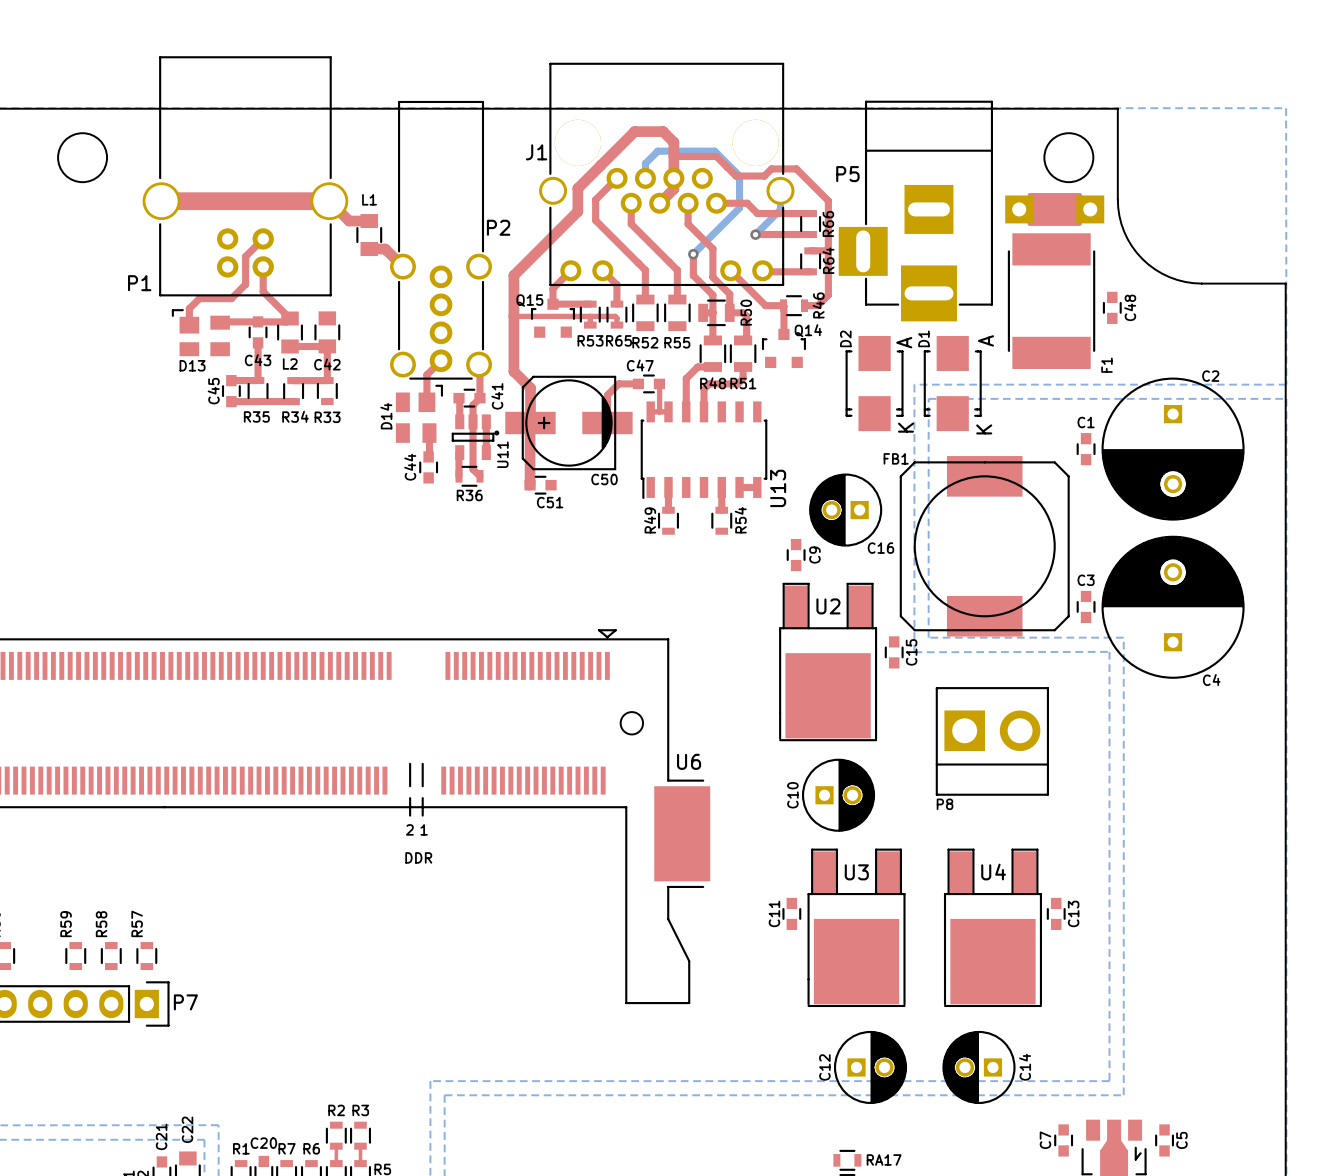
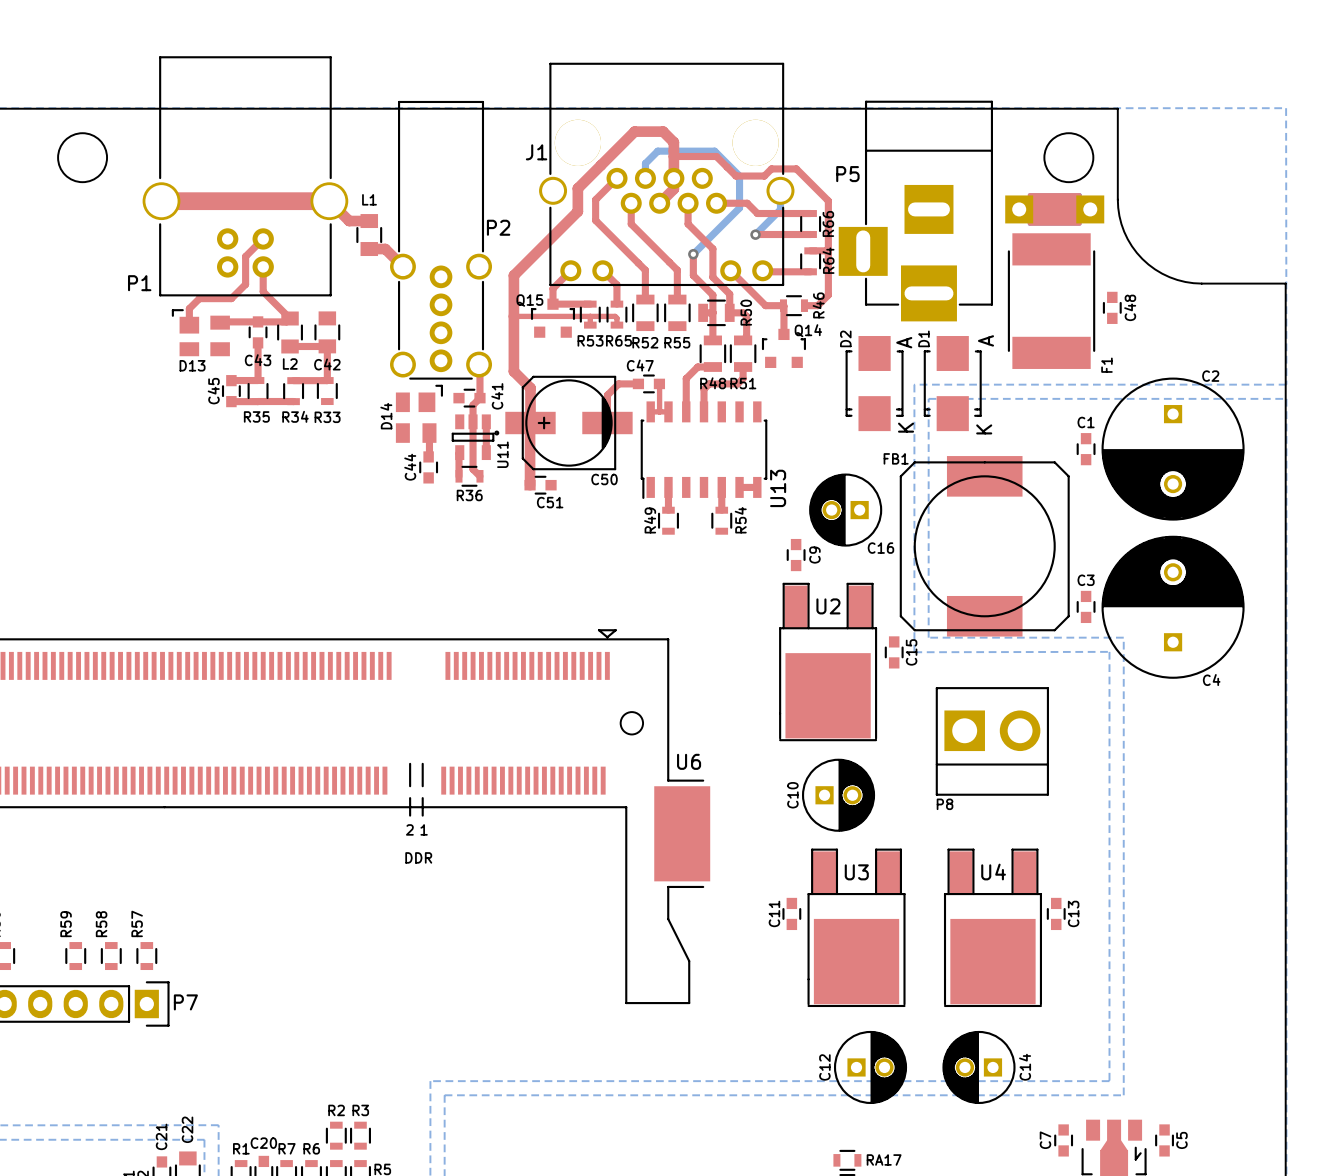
top track: (441, 360) (426, 374) (426, 402) -> none
top track: (458, 398) (459, 421) -> none
top track: (336, 1146) (336, 1163) -> none
top track: (360, 1146) (360, 1163) -> none

